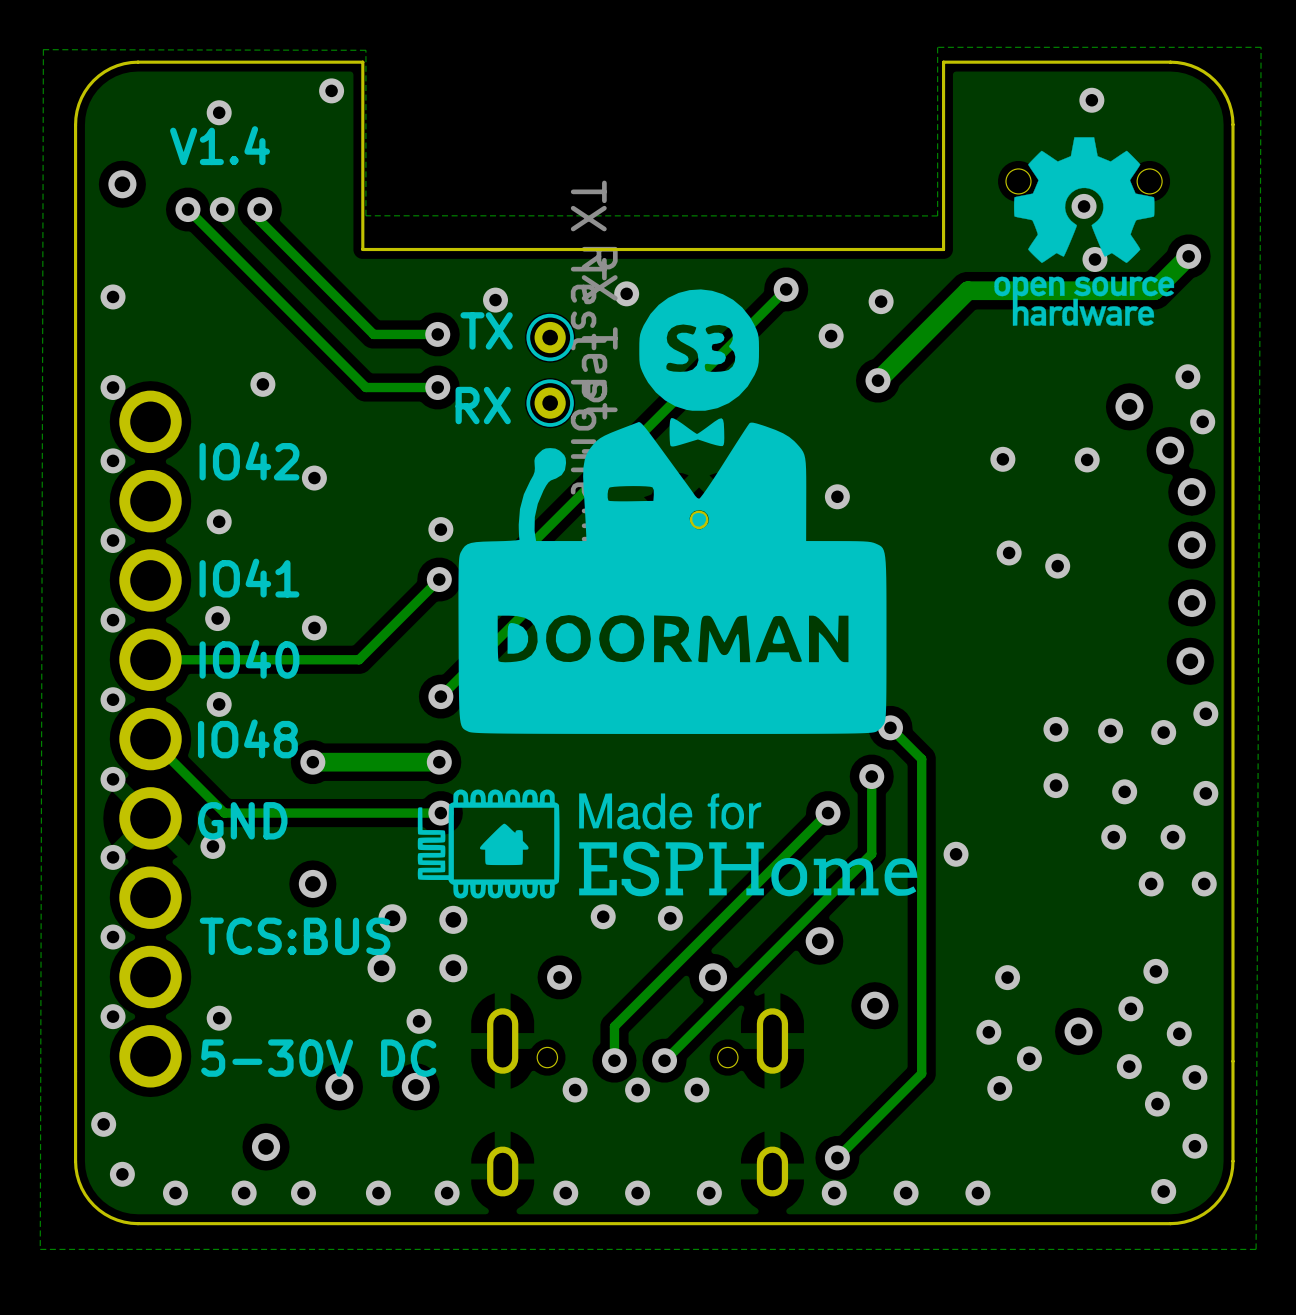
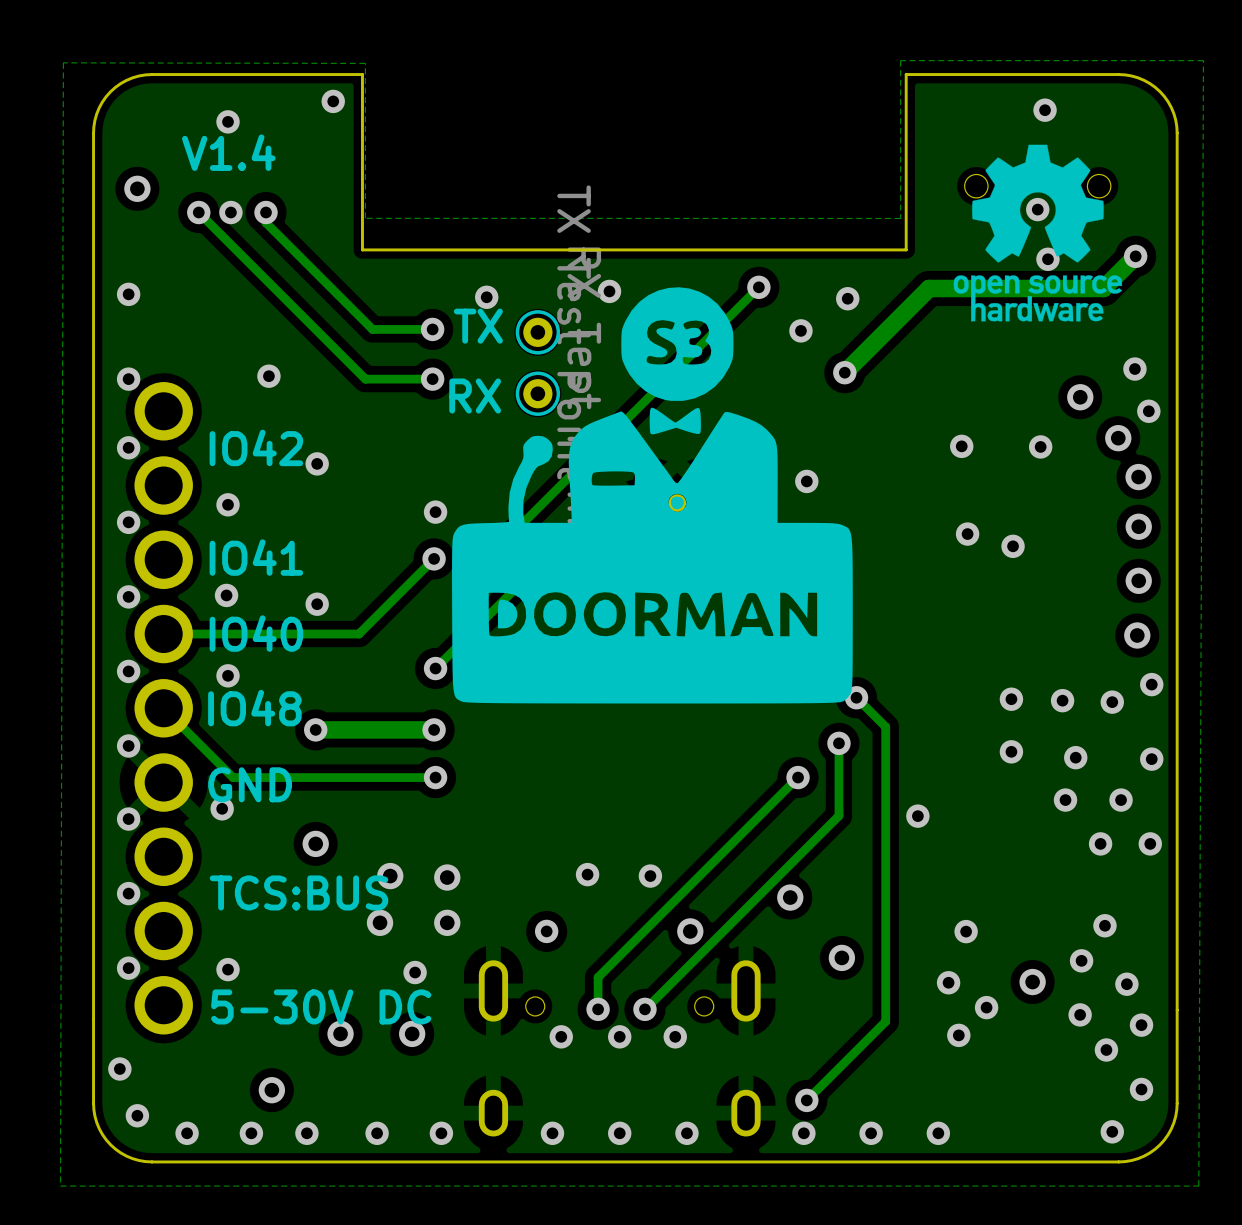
drawing: [417, 789, 918, 899] -> none

